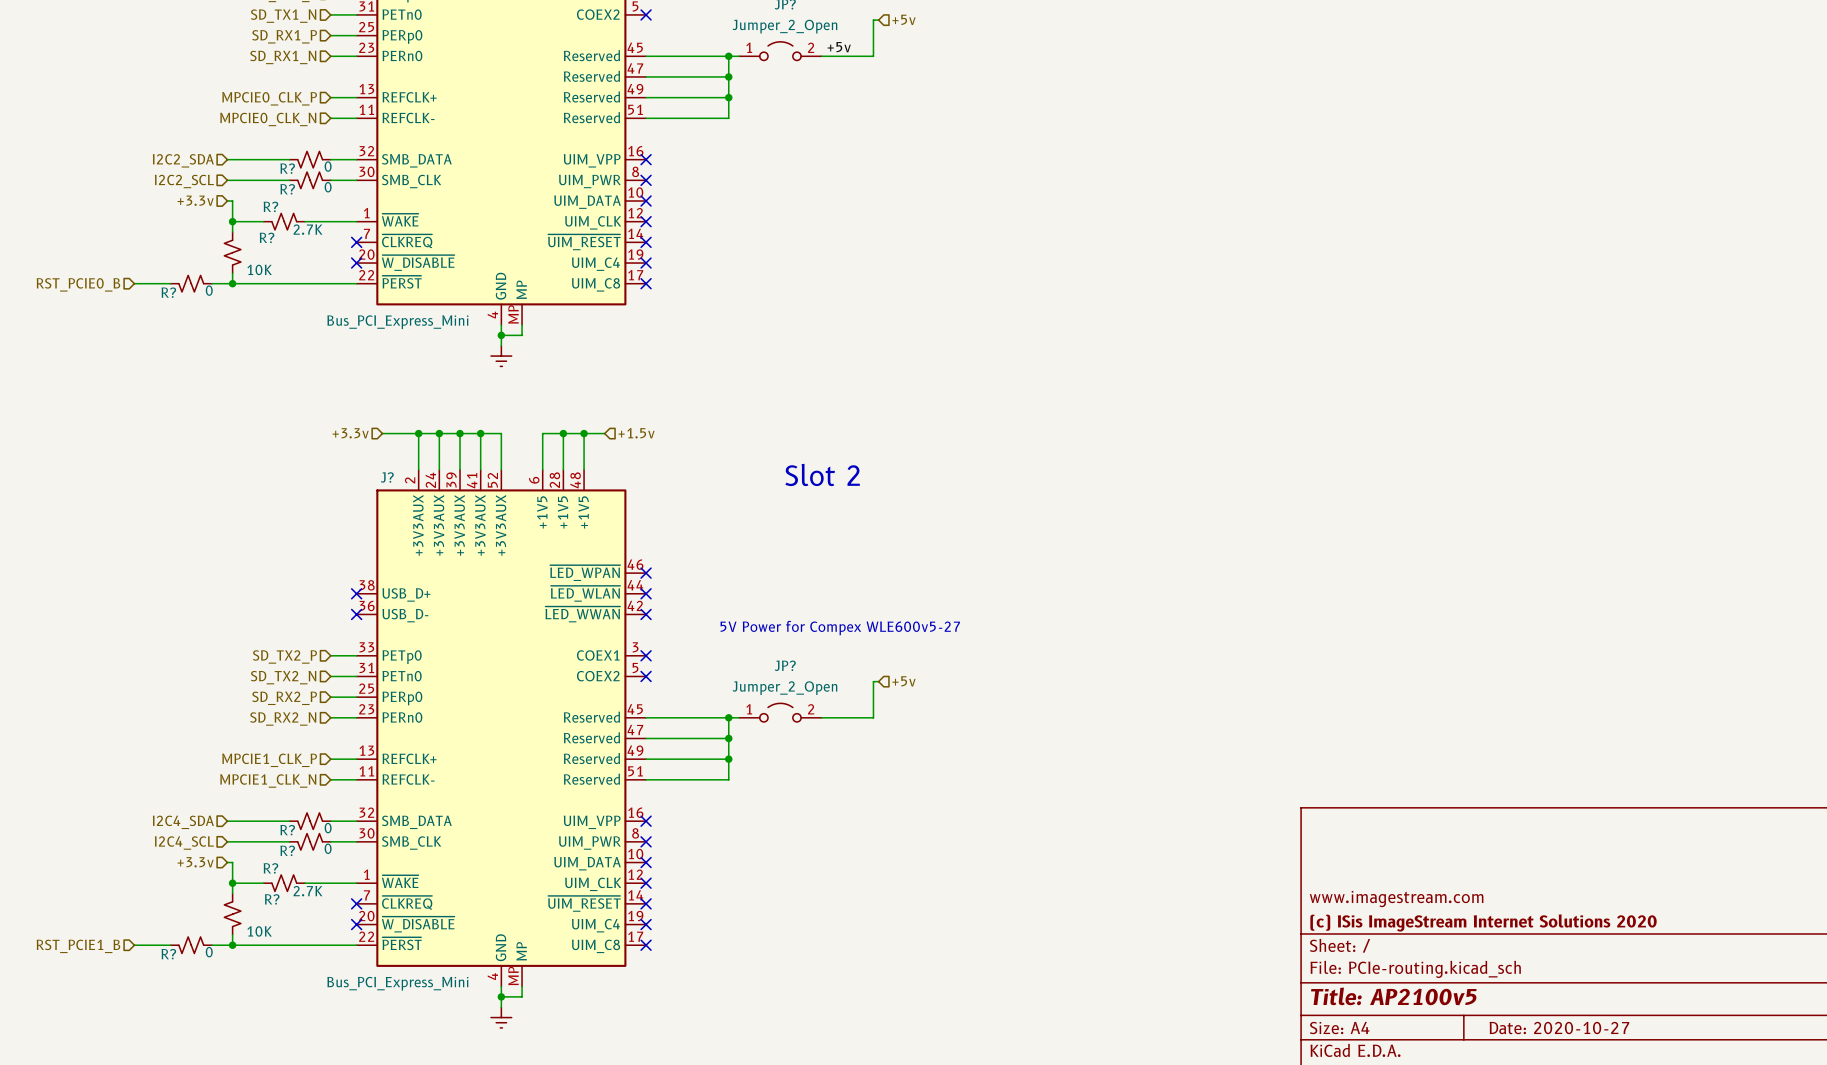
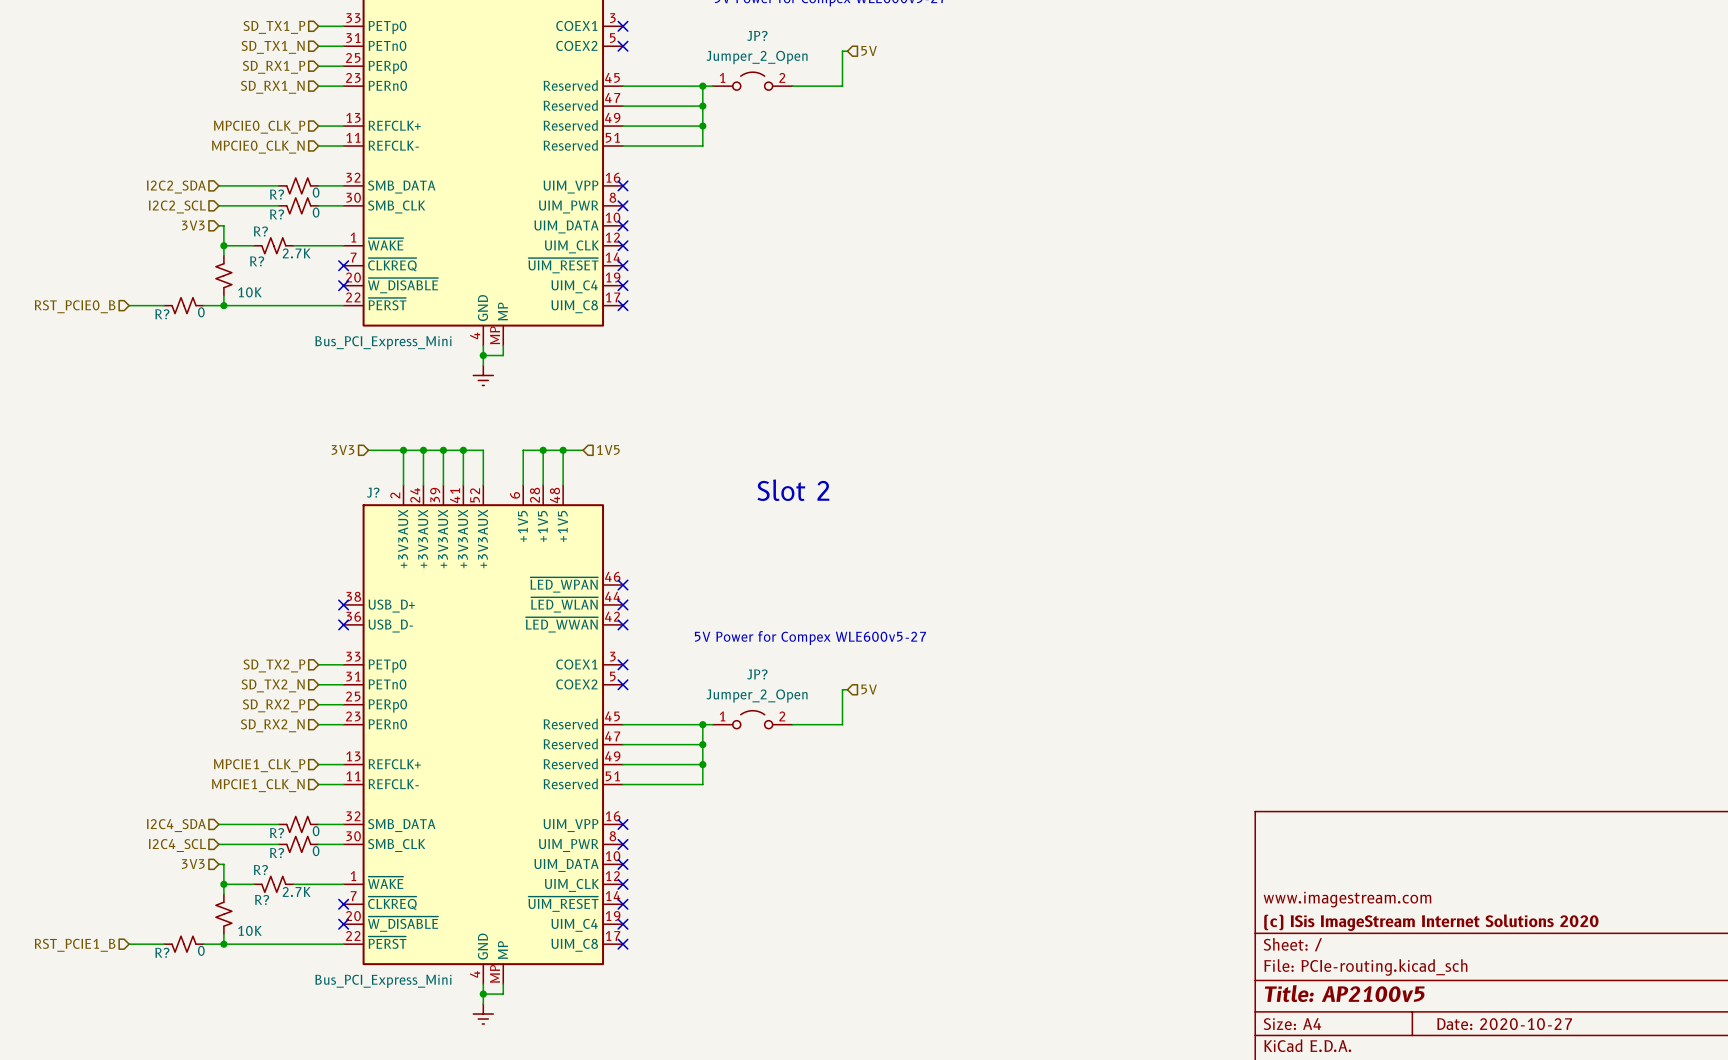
hierarchical label: +5v (904, 19) -> 5V (869, 50)
label: +5v (839, 47) -> none
hierarchical label: +3.3v (195, 200) -> 3V3 (193, 225)
hierarchical label: +3.3v (350, 433) -> 3V3 (342, 450)
hierarchical label: +1.5v (636, 433) -> 1V5 (608, 450)
hierarchical label: +5v (904, 681) -> 5V (869, 689)
hierarchical label: +3.3v (195, 862) -> 3V3 (193, 864)

